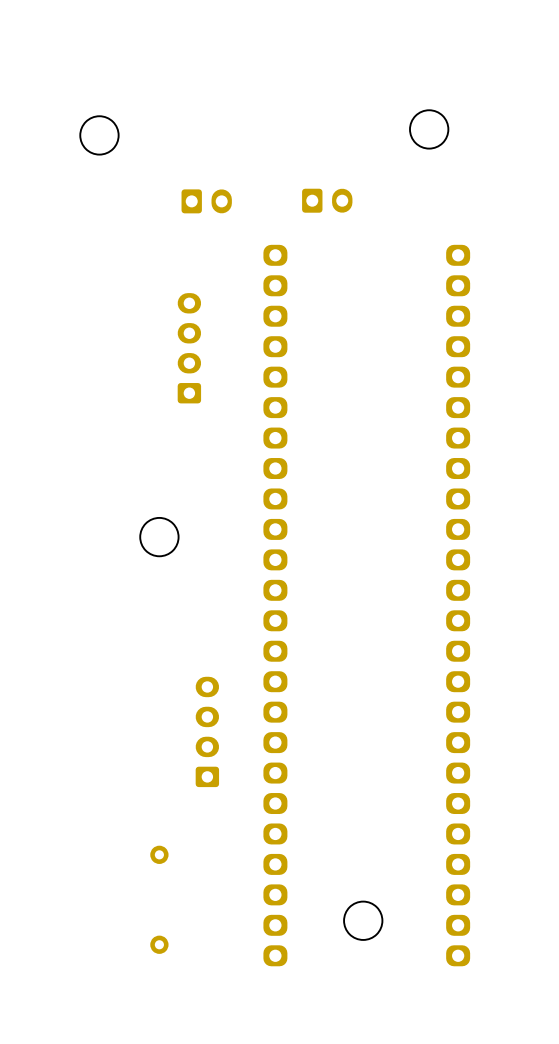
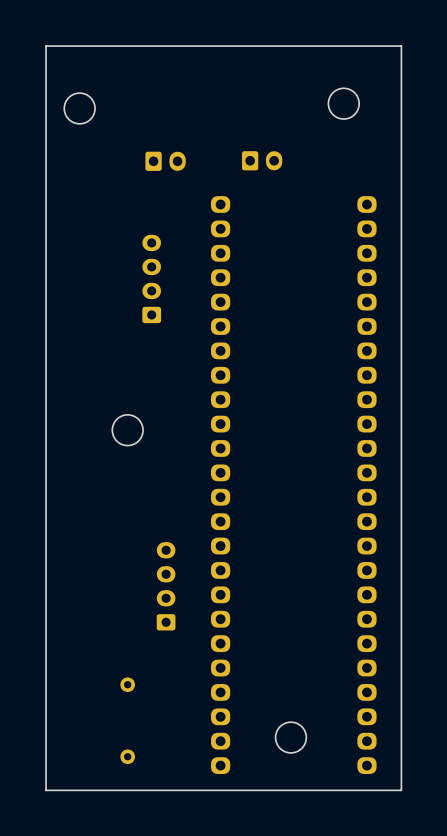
board edge: none -> (401, 46) (401, 790) (46, 790) (46, 46) (401, 46)

